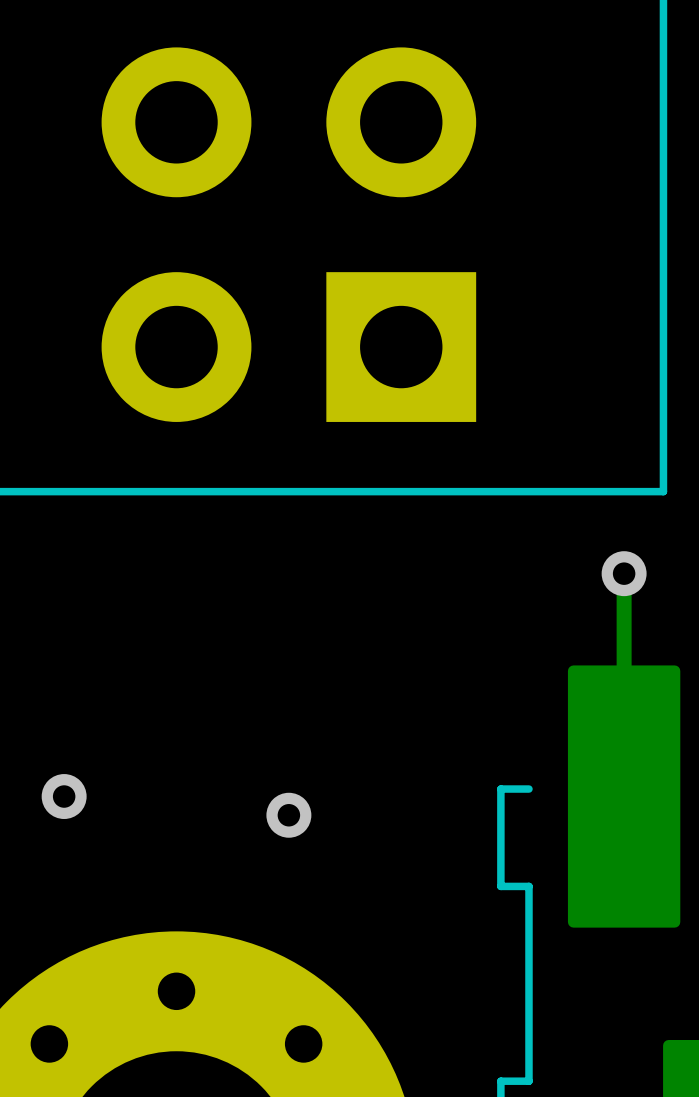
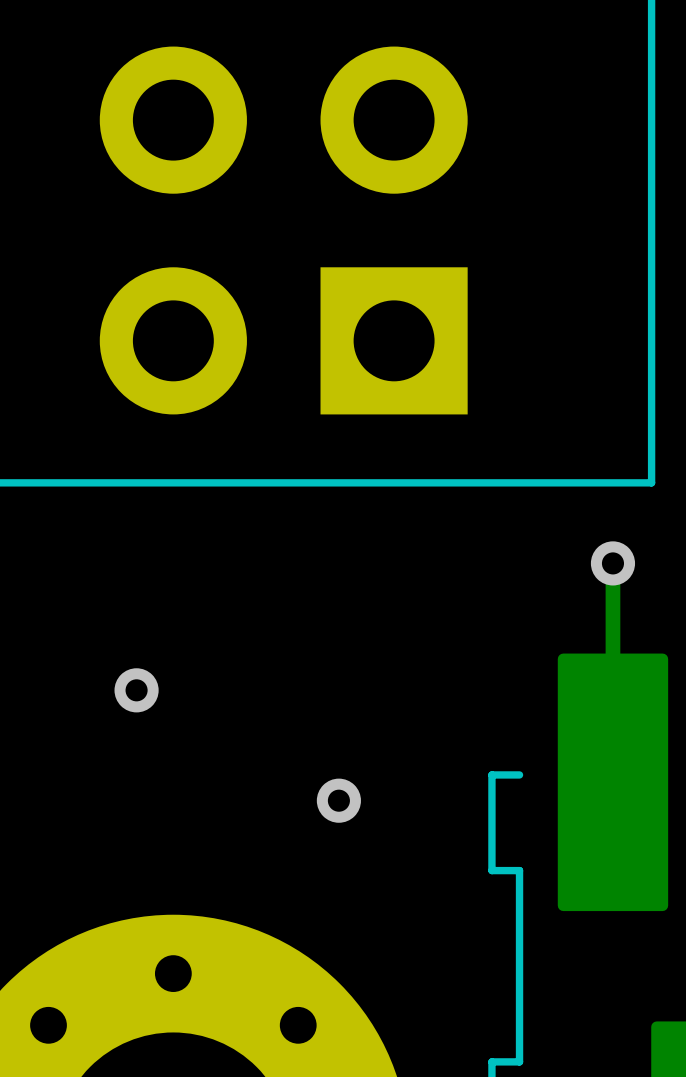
via: none -> (136, 690)
via: (64, 796) -> none
via position: (288, 815) -> (338, 800)

